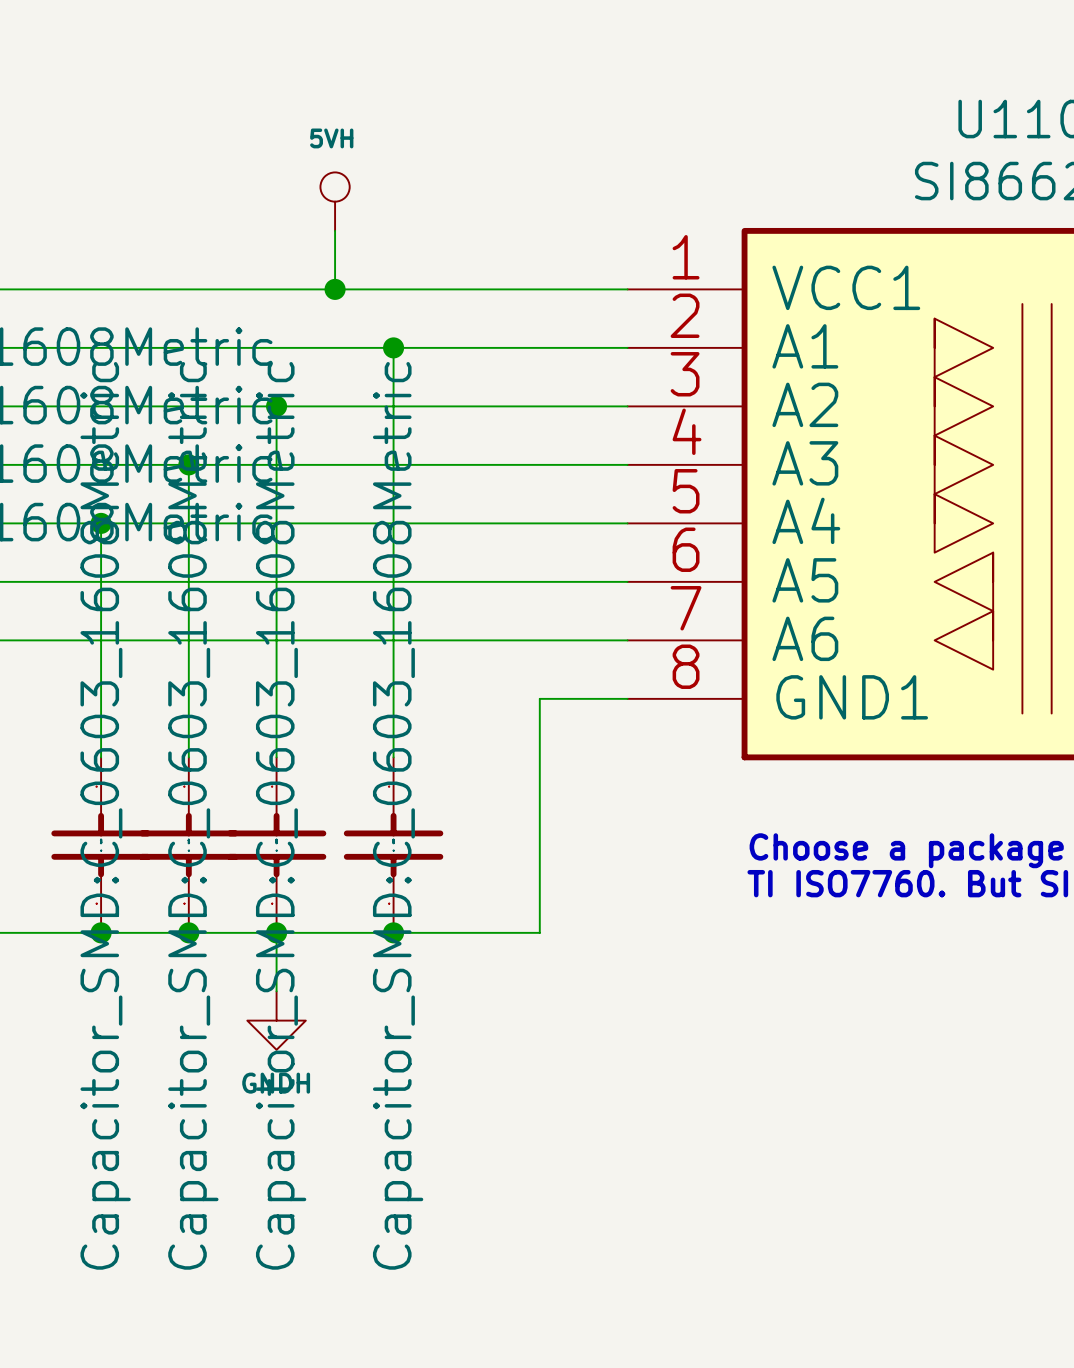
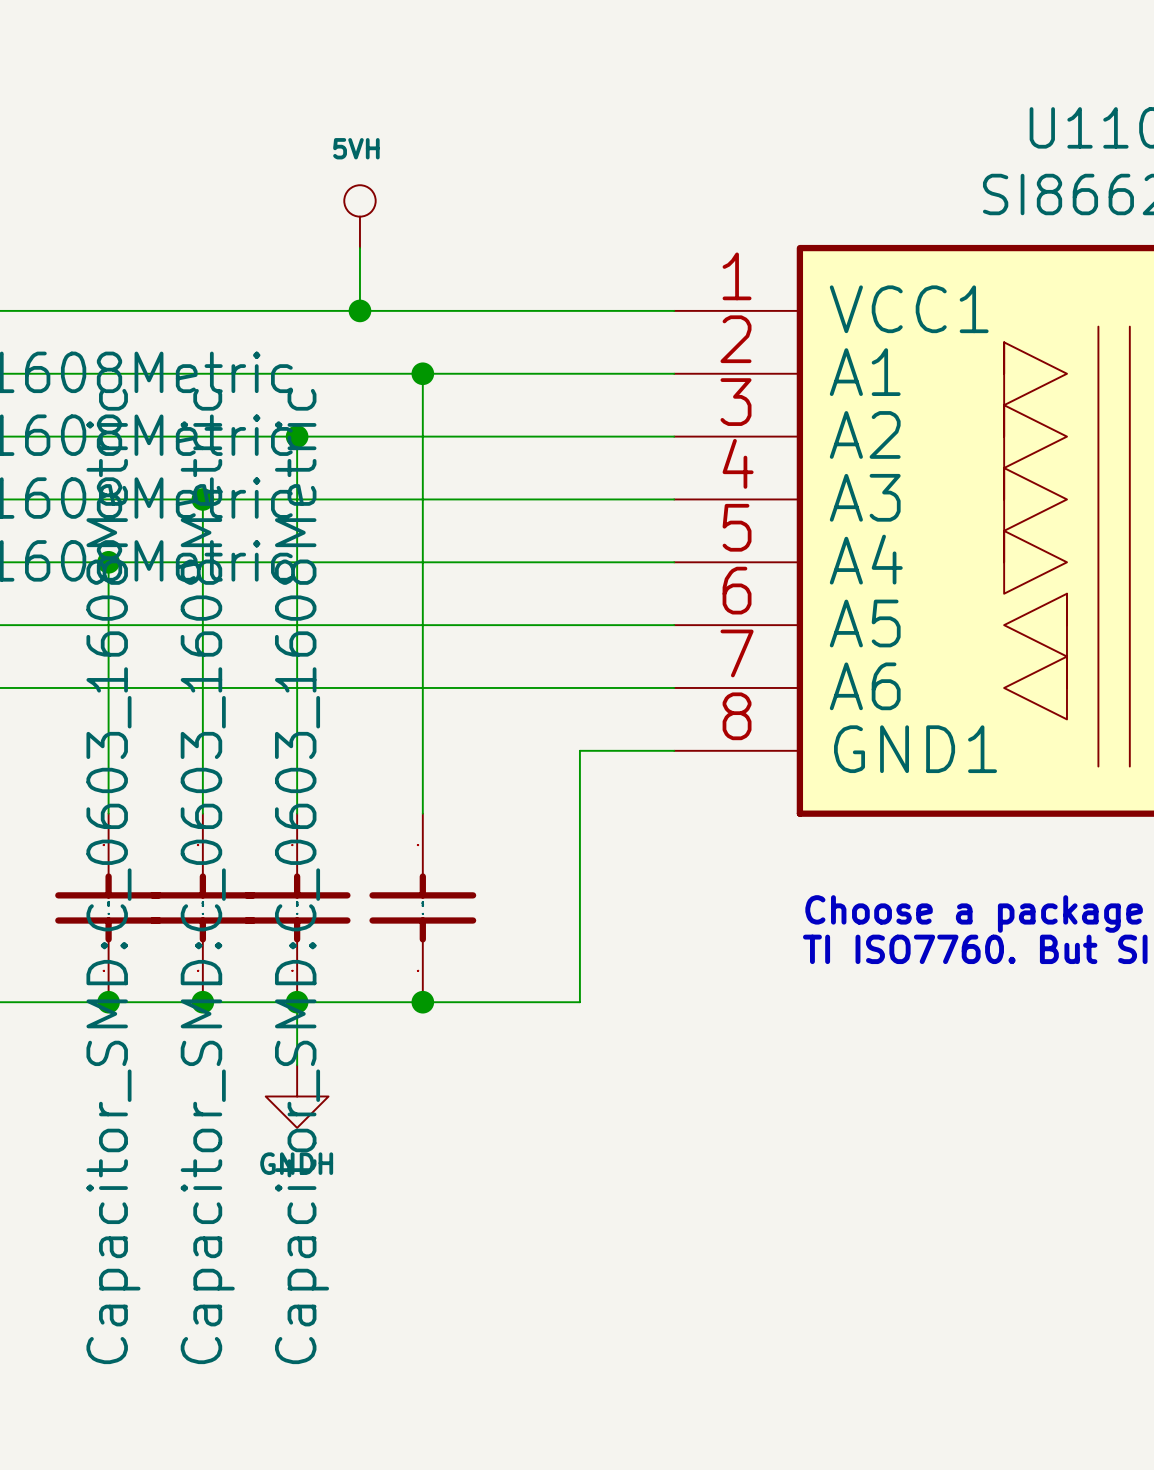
part text: Capacitor_SMD:C_0603_1608Metric (398, 815) -> none

